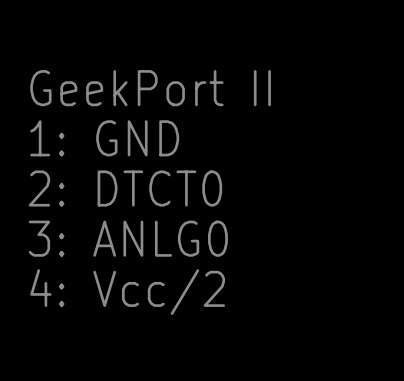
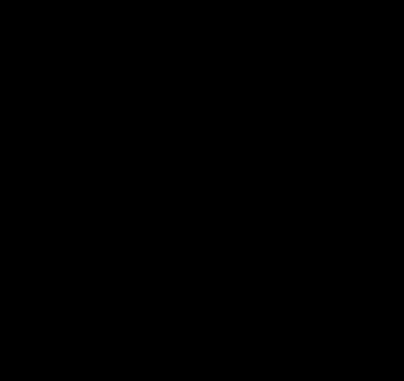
text: GeekPort II (150, 88) -> none
text: 1: GND (104, 138) -> none
text: 2: DTCT0 (125, 188) -> none
text: 3: ANLG0 (128, 238) -> none
text: 4: Vcc/2 (127, 292) -> none

